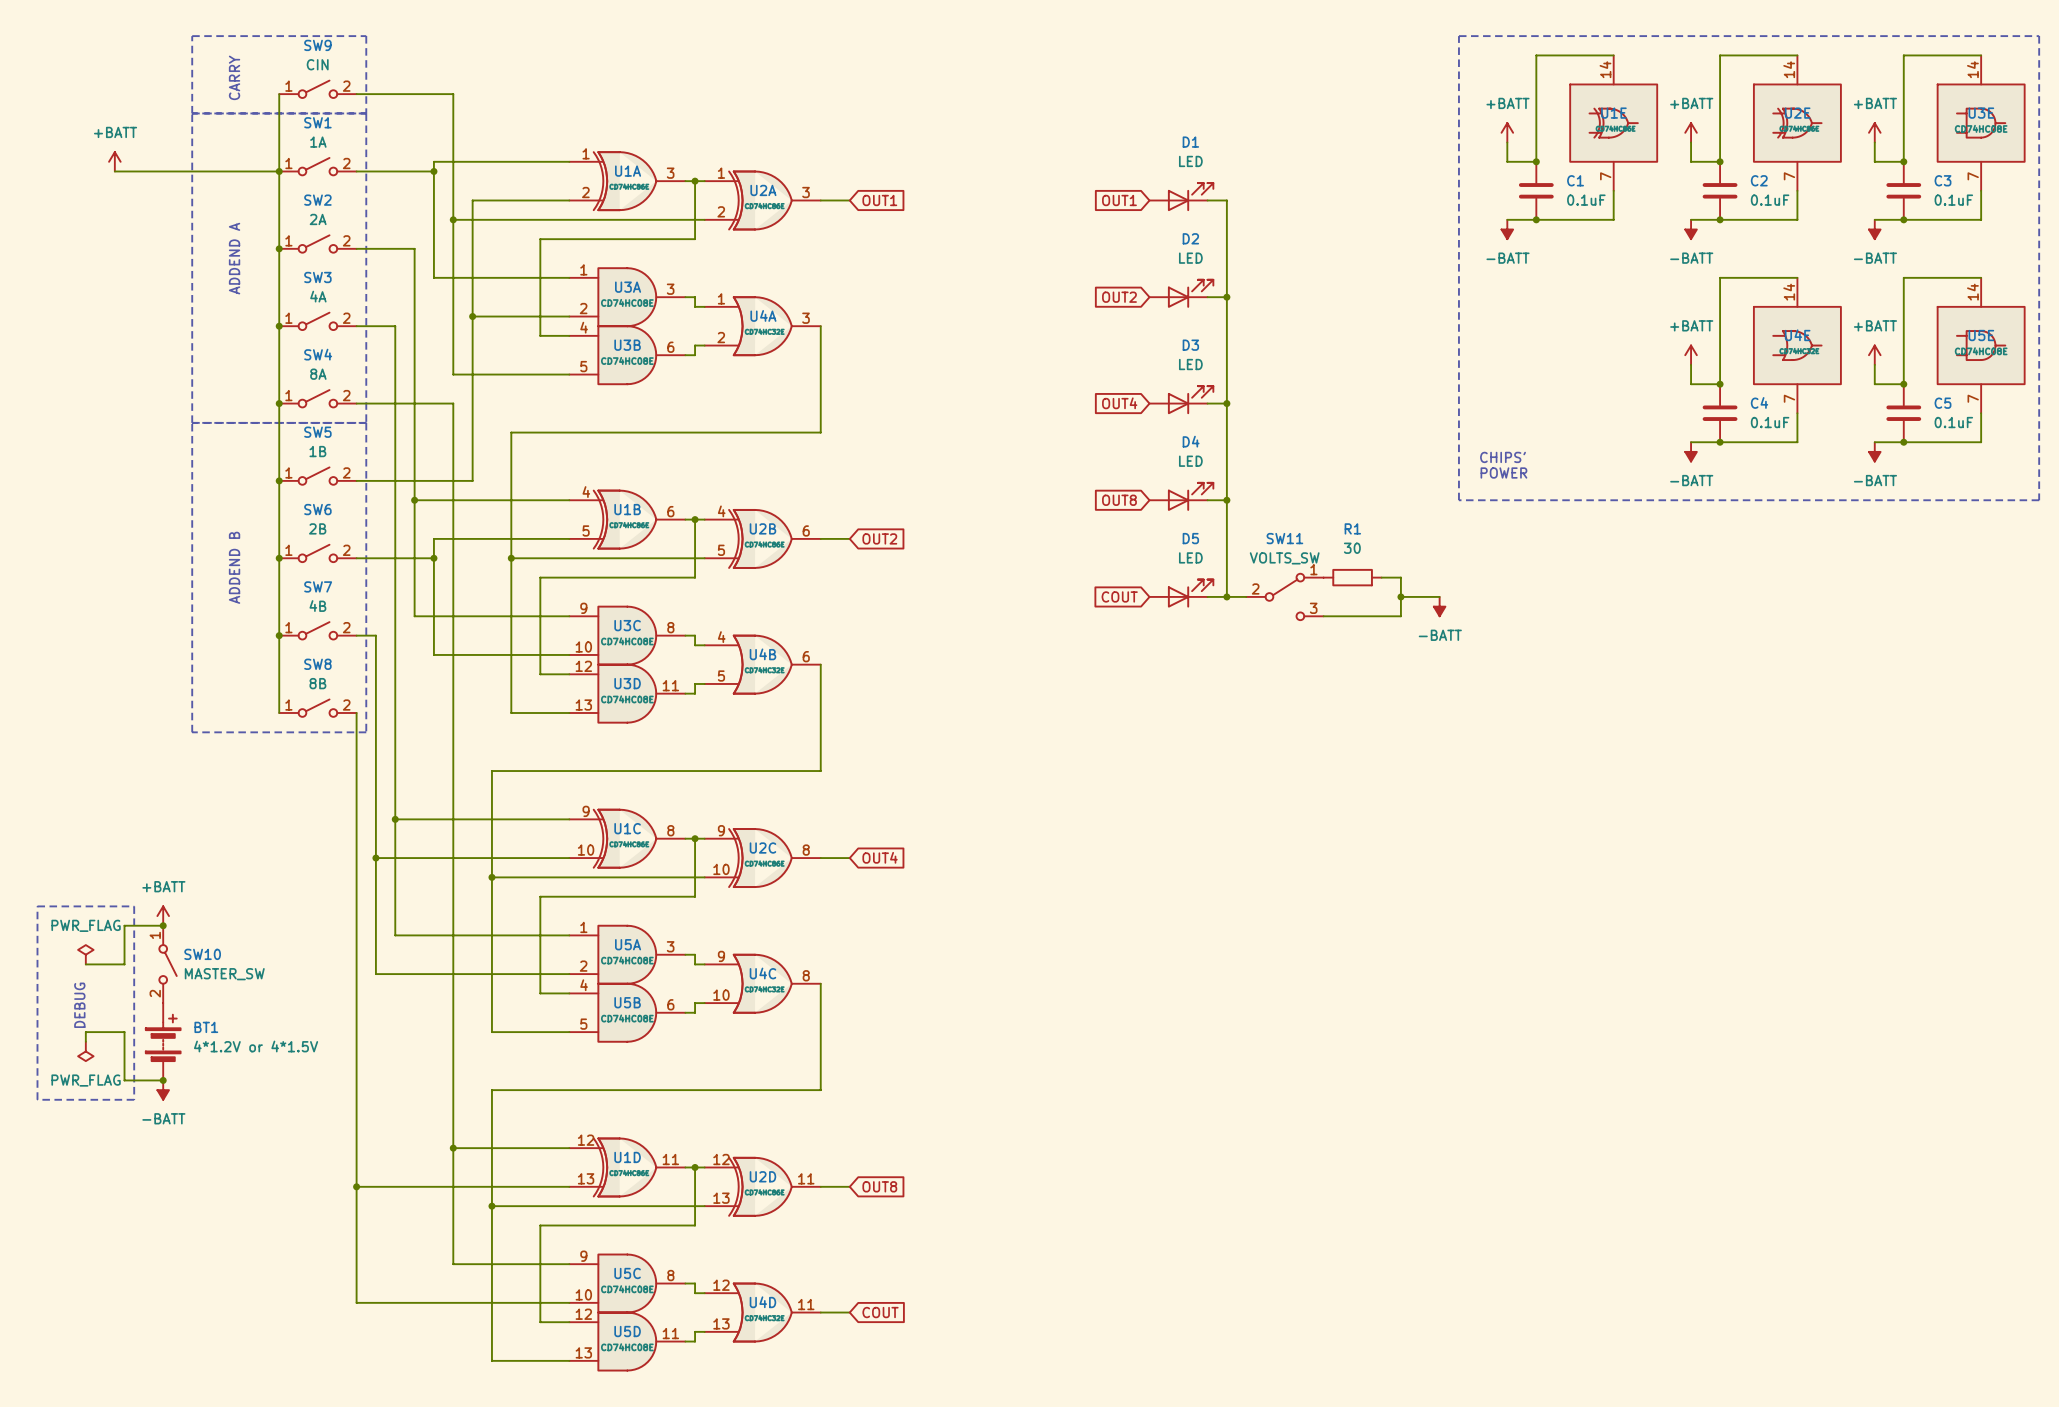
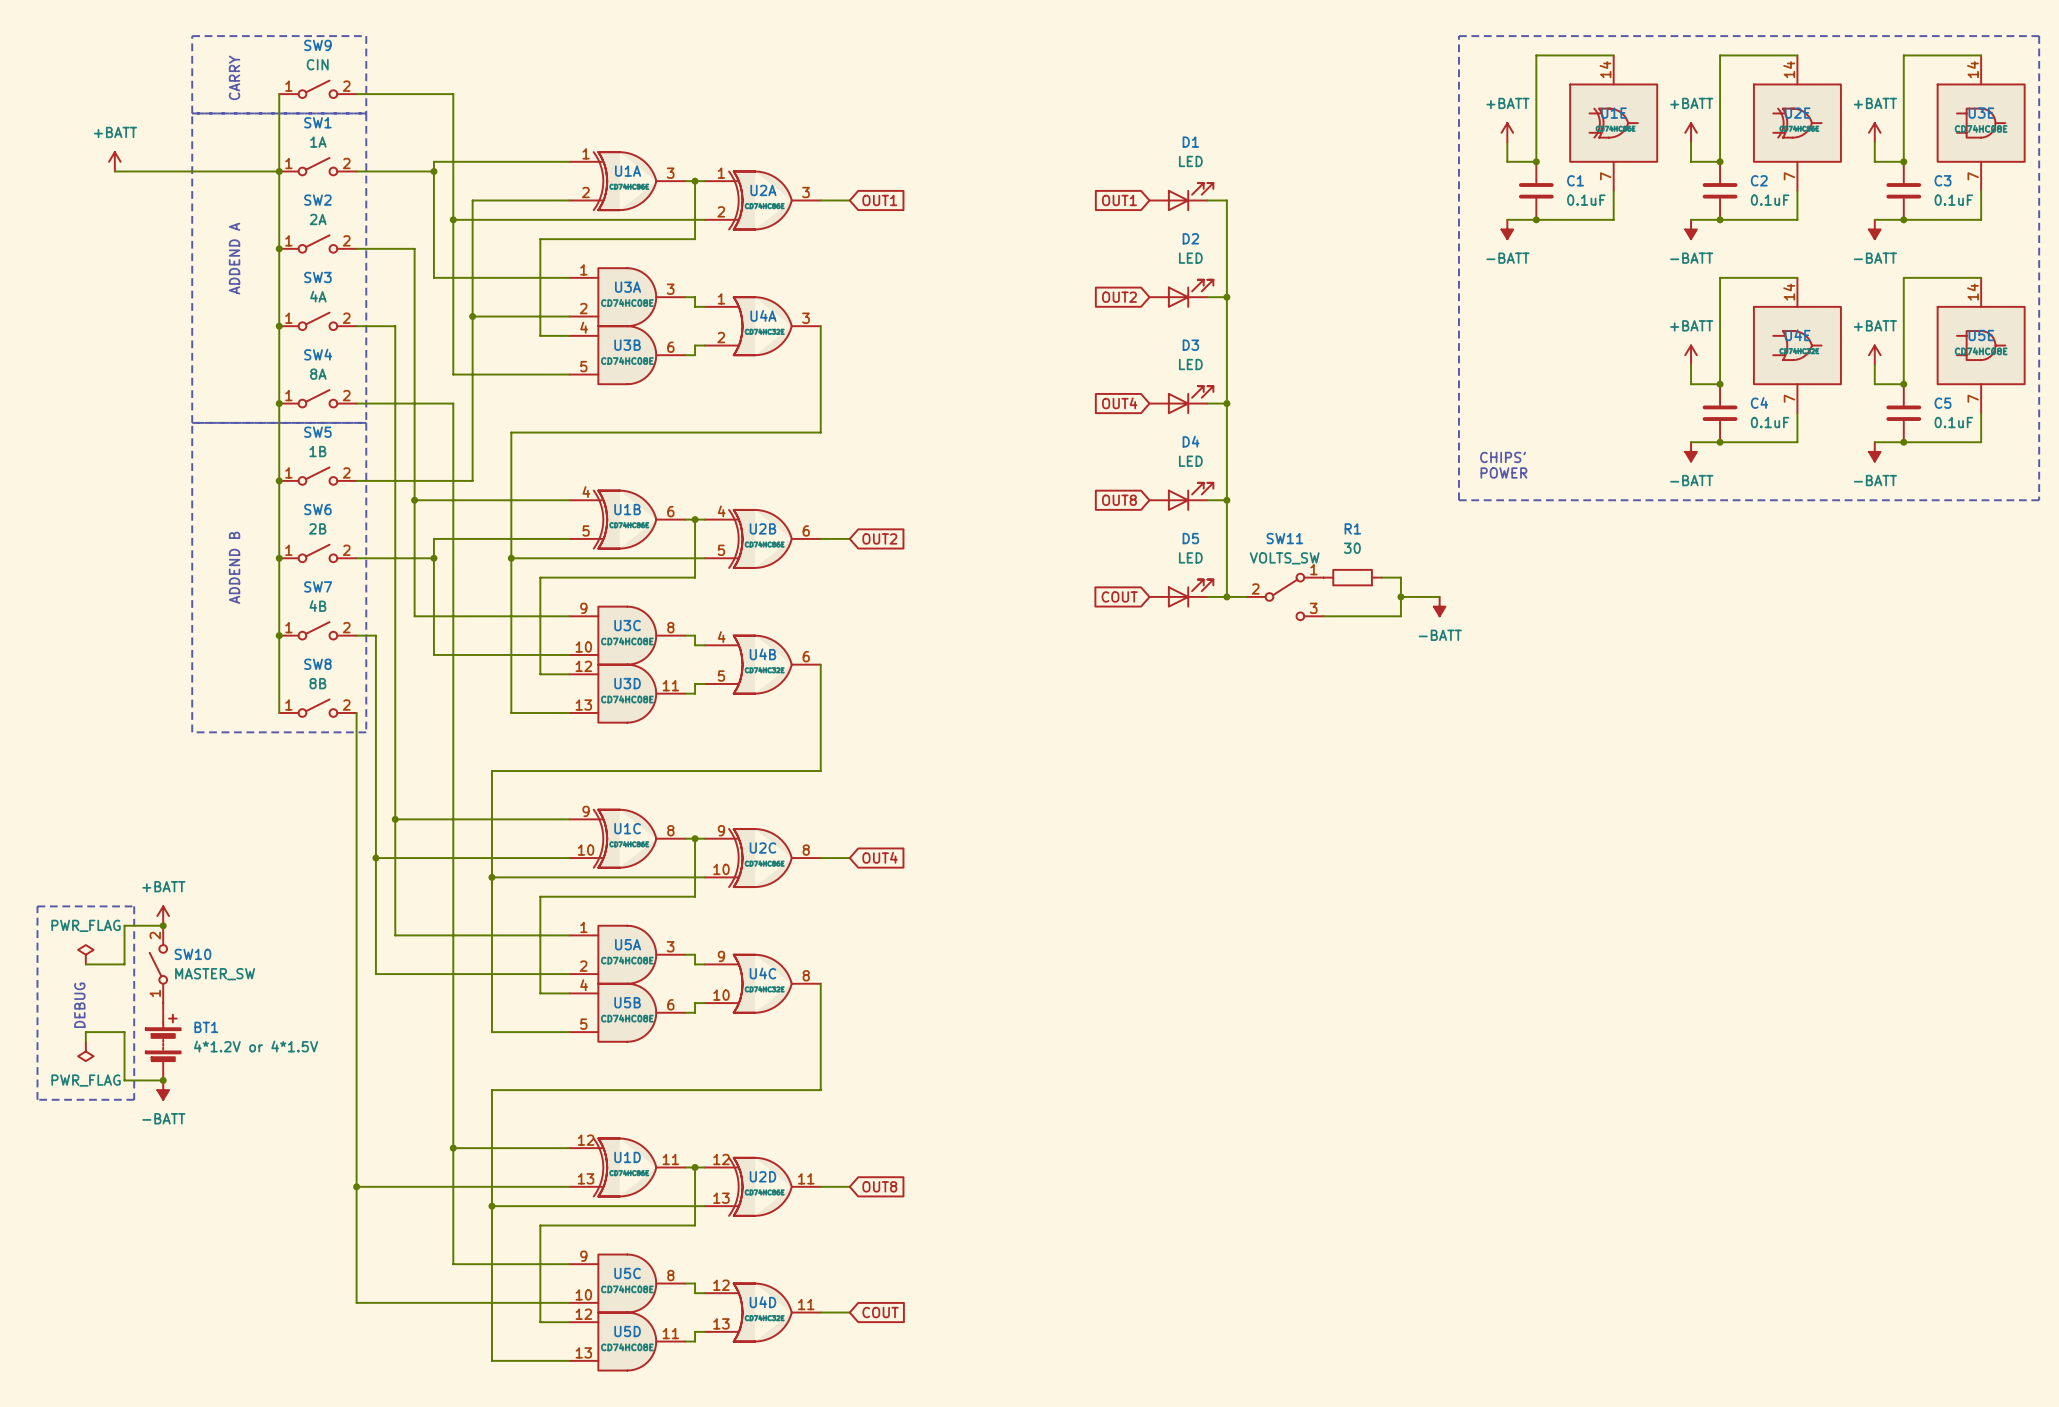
SW10 rotation: 0° (168, 964) -> 180° (158, 964)

